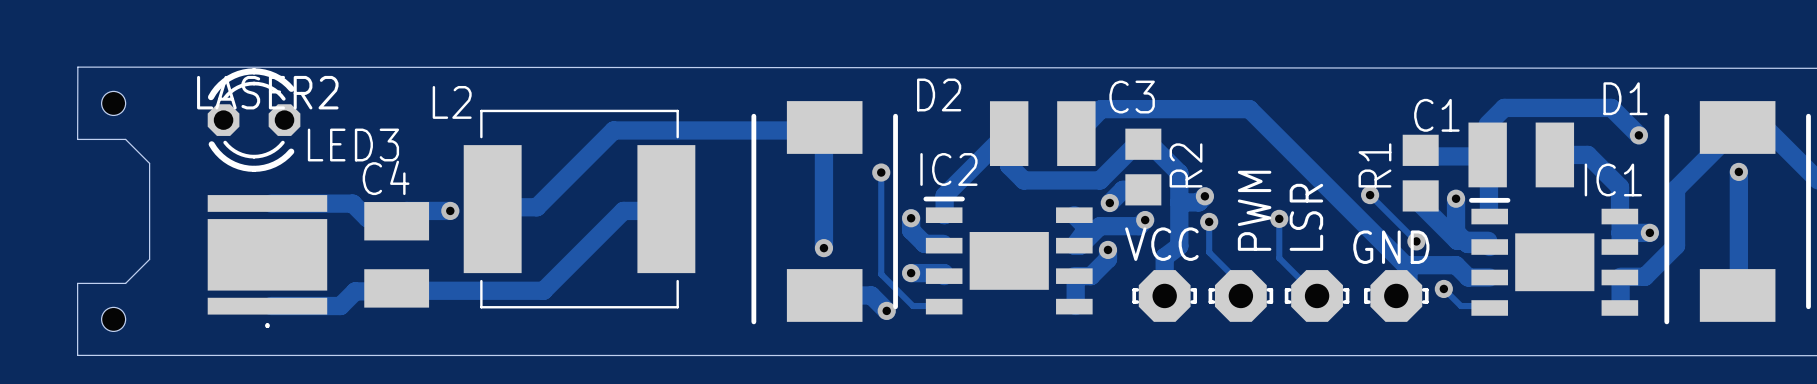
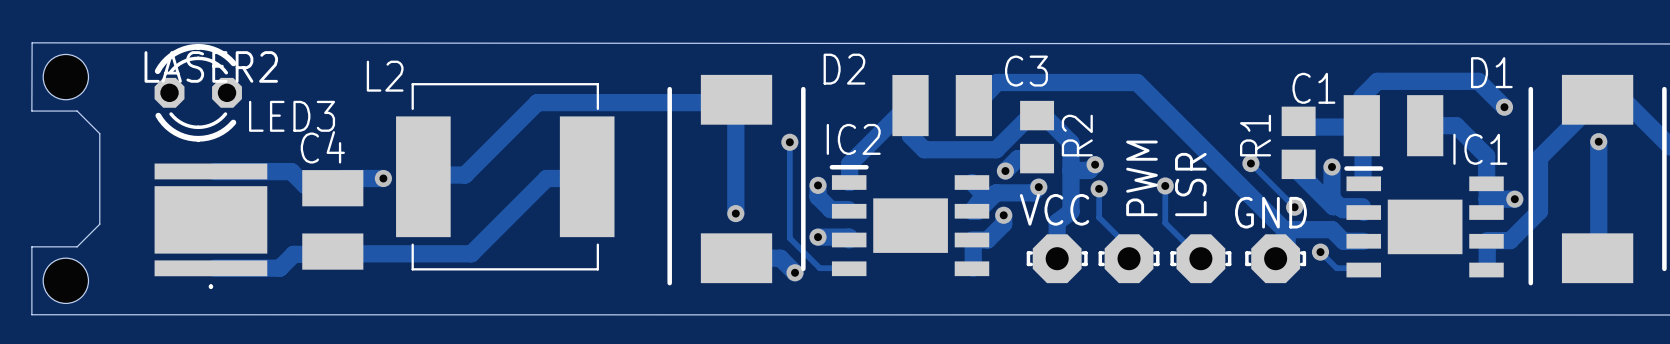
hole size: [101, 91, 126, 116] -> [43, 54, 89, 100]
hole size: [101, 307, 126, 332] -> [43, 258, 89, 304]

